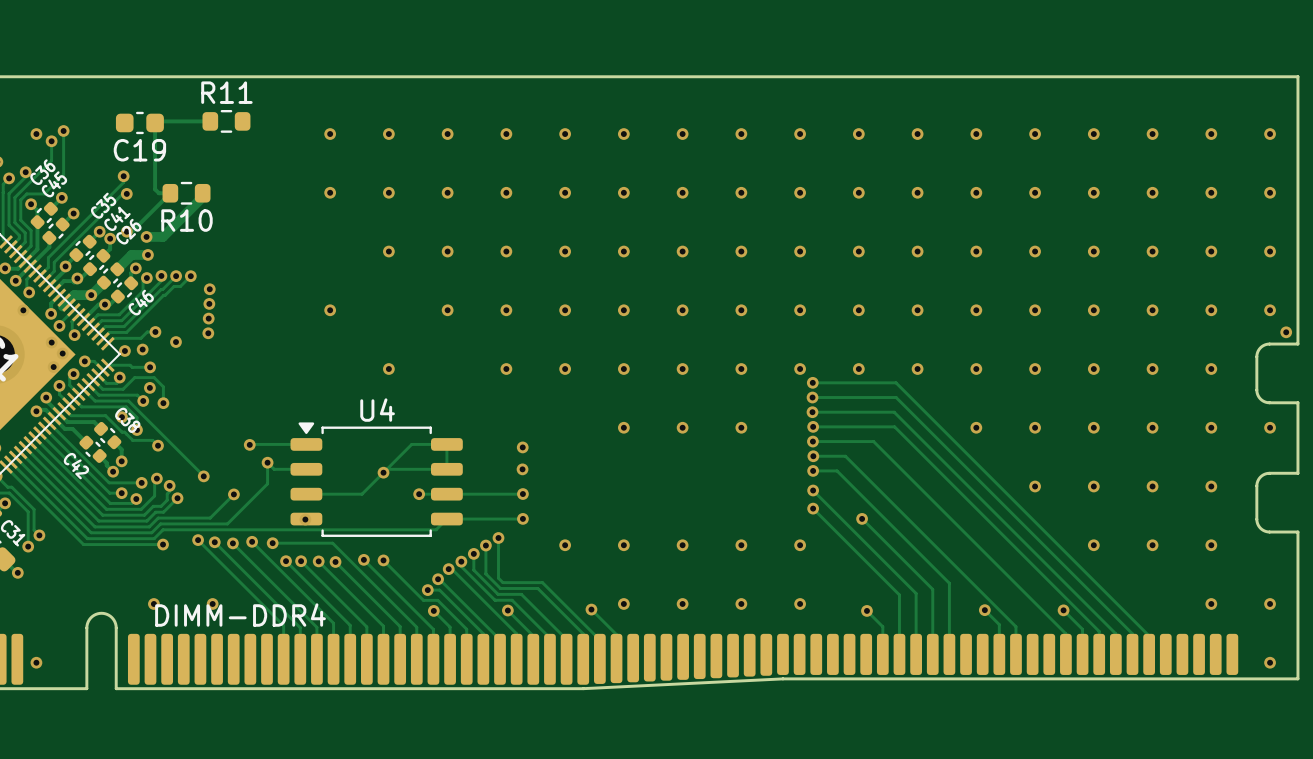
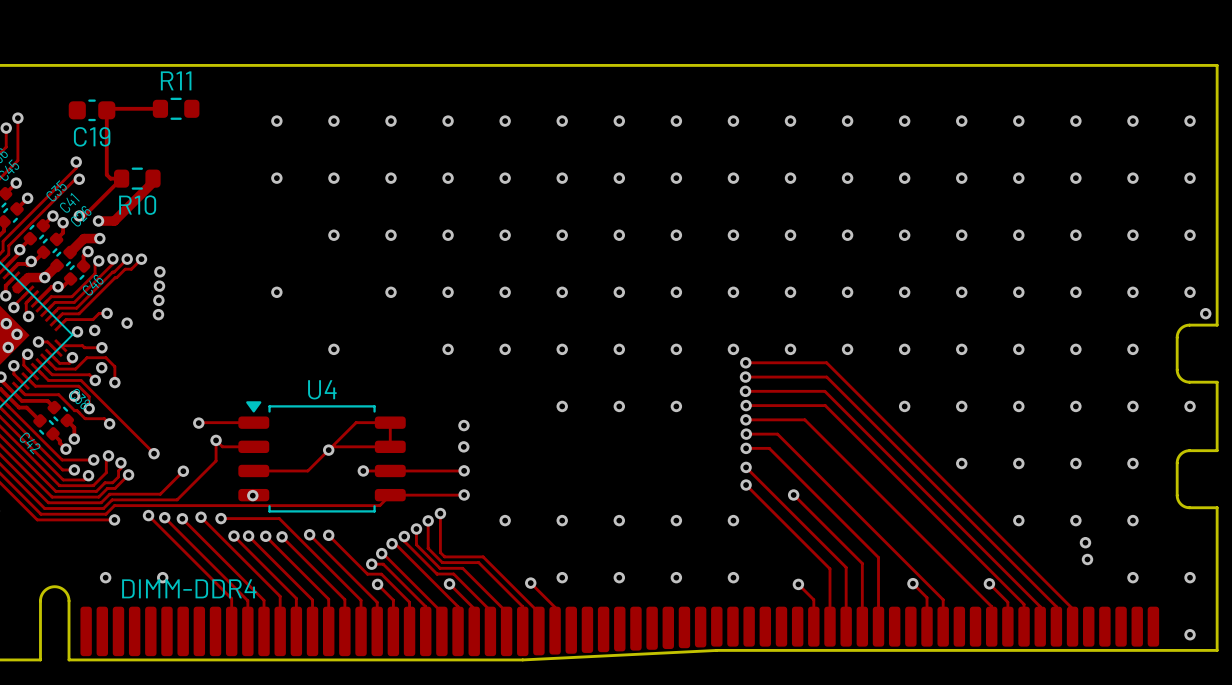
via: none -> (1085, 542)
via: none -> (1087, 559)

